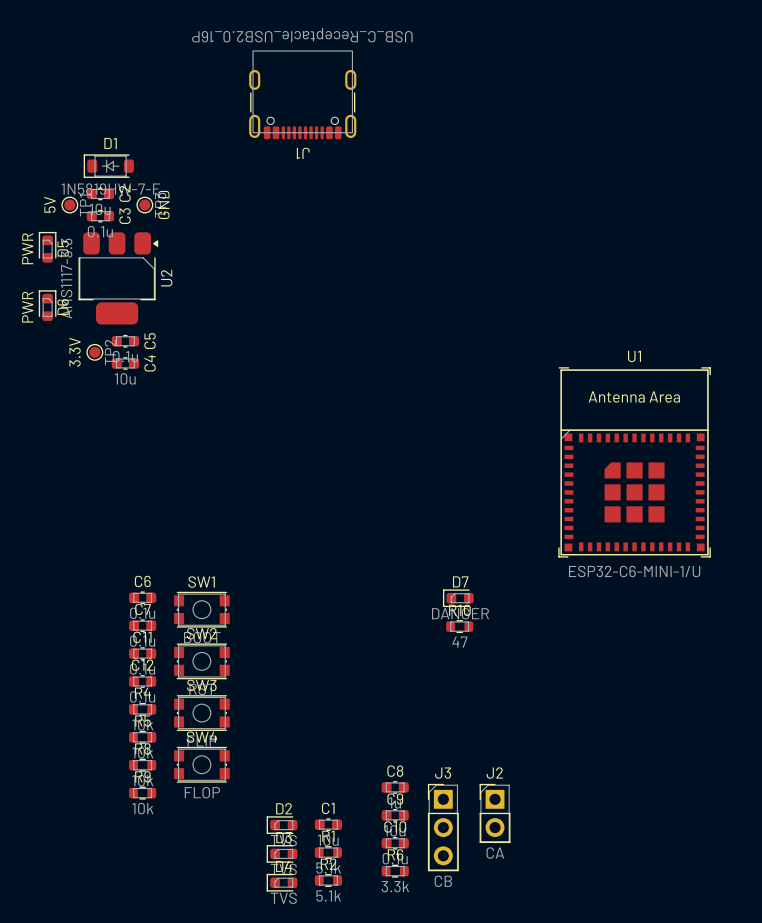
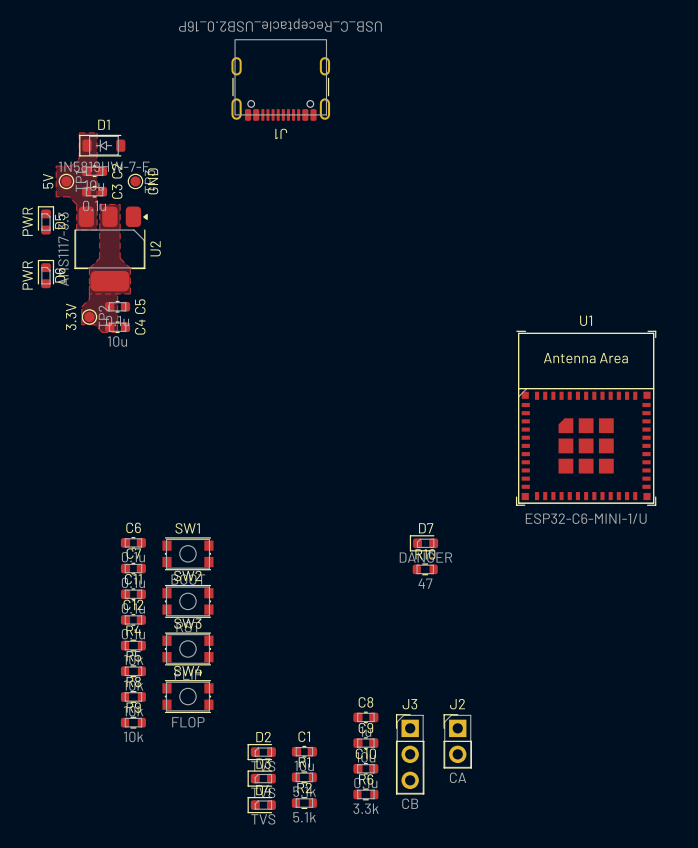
zone outline: none -> (79, 132) (79, 158) (71, 166) (56, 166) (56, 196) (68, 196) (76, 204) (76, 230) (97, 230) (97, 132) (79, 132)
zone outline: none -> (89, 286) (117, 286) (117, 332) (102, 332) (94, 324) (81, 324) (81, 306) (89, 299) (89, 268) (99, 258) (99, 204) (120, 204) (120, 258) (130, 268) (130, 293) (89, 293)

